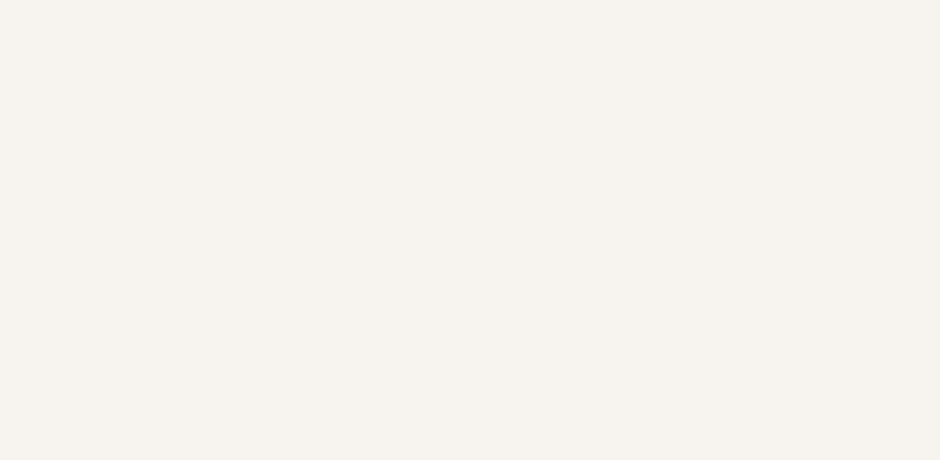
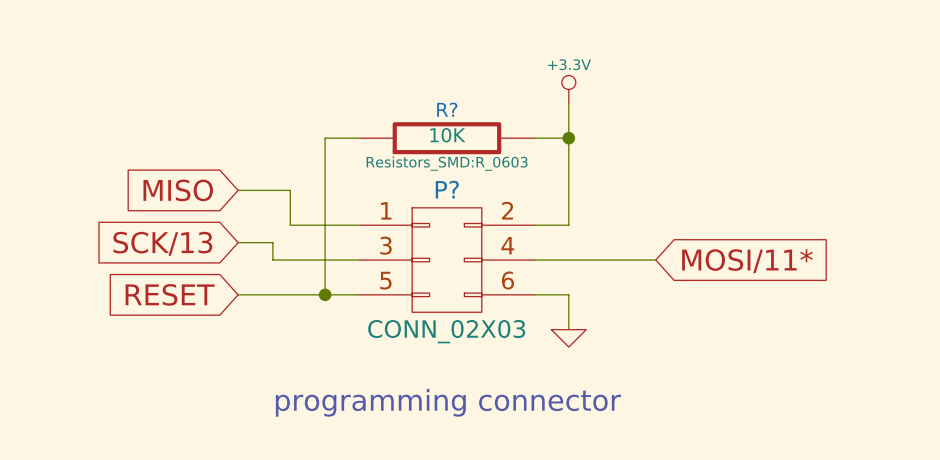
power symbol: none -> +3.3V (568, 89)
wire: none -> (568, 103) (568, 225) (533, 225)
wire: none -> (359, 138) (325, 138) (325, 294)
R?: none -> 10K (446, 138)
wire: none -> (533, 138) (568, 138)
junction: none -> (568, 138)
global label: none -> MISO (178, 190)
wire: none -> (238, 190) (290, 190) (290, 225) (359, 225)
wire: none -> (238, 242) (272, 242) (272, 260) (359, 260)
global label: none -> SCK/13 (162, 243)
P?: none -> CONN_02X03 (446, 260)
wire: none -> (533, 260) (655, 260)
global label: none -> MOSI/11* (747, 261)
global label: none -> RESET (170, 294)
wire: none -> (238, 294) (359, 294)
junction: none -> (325, 294)
wire: none -> (533, 294) (568, 294) (568, 329)
power symbol: none -> (568, 338)
text: none -> programming connector (448, 402)

